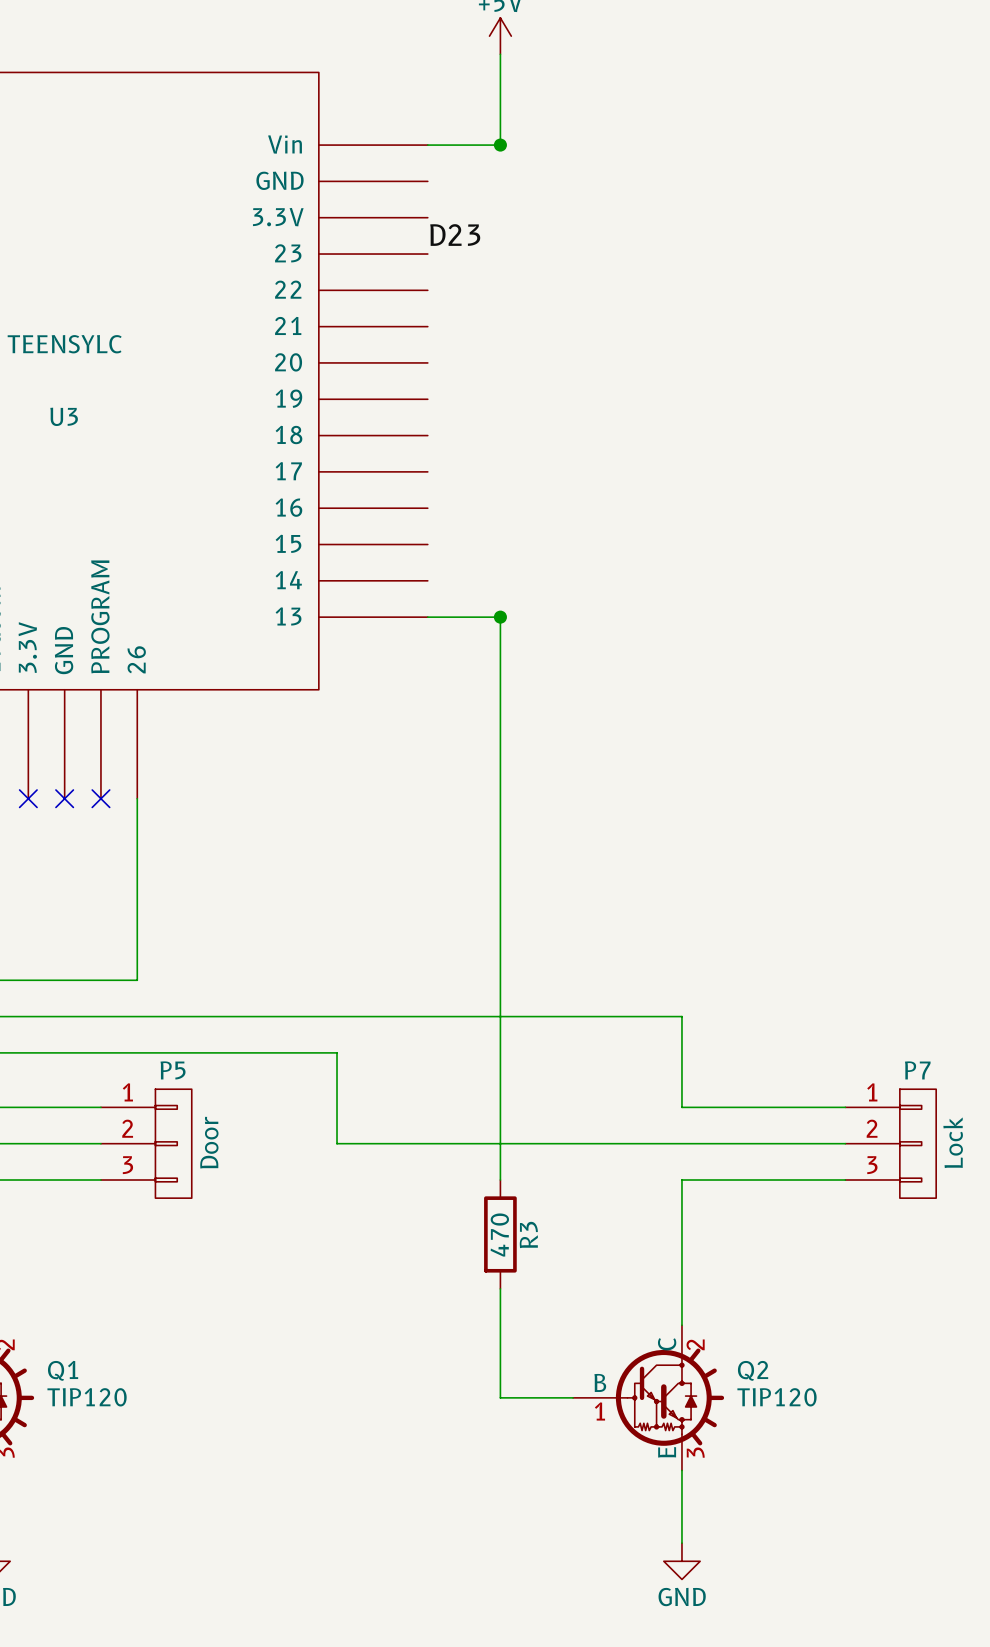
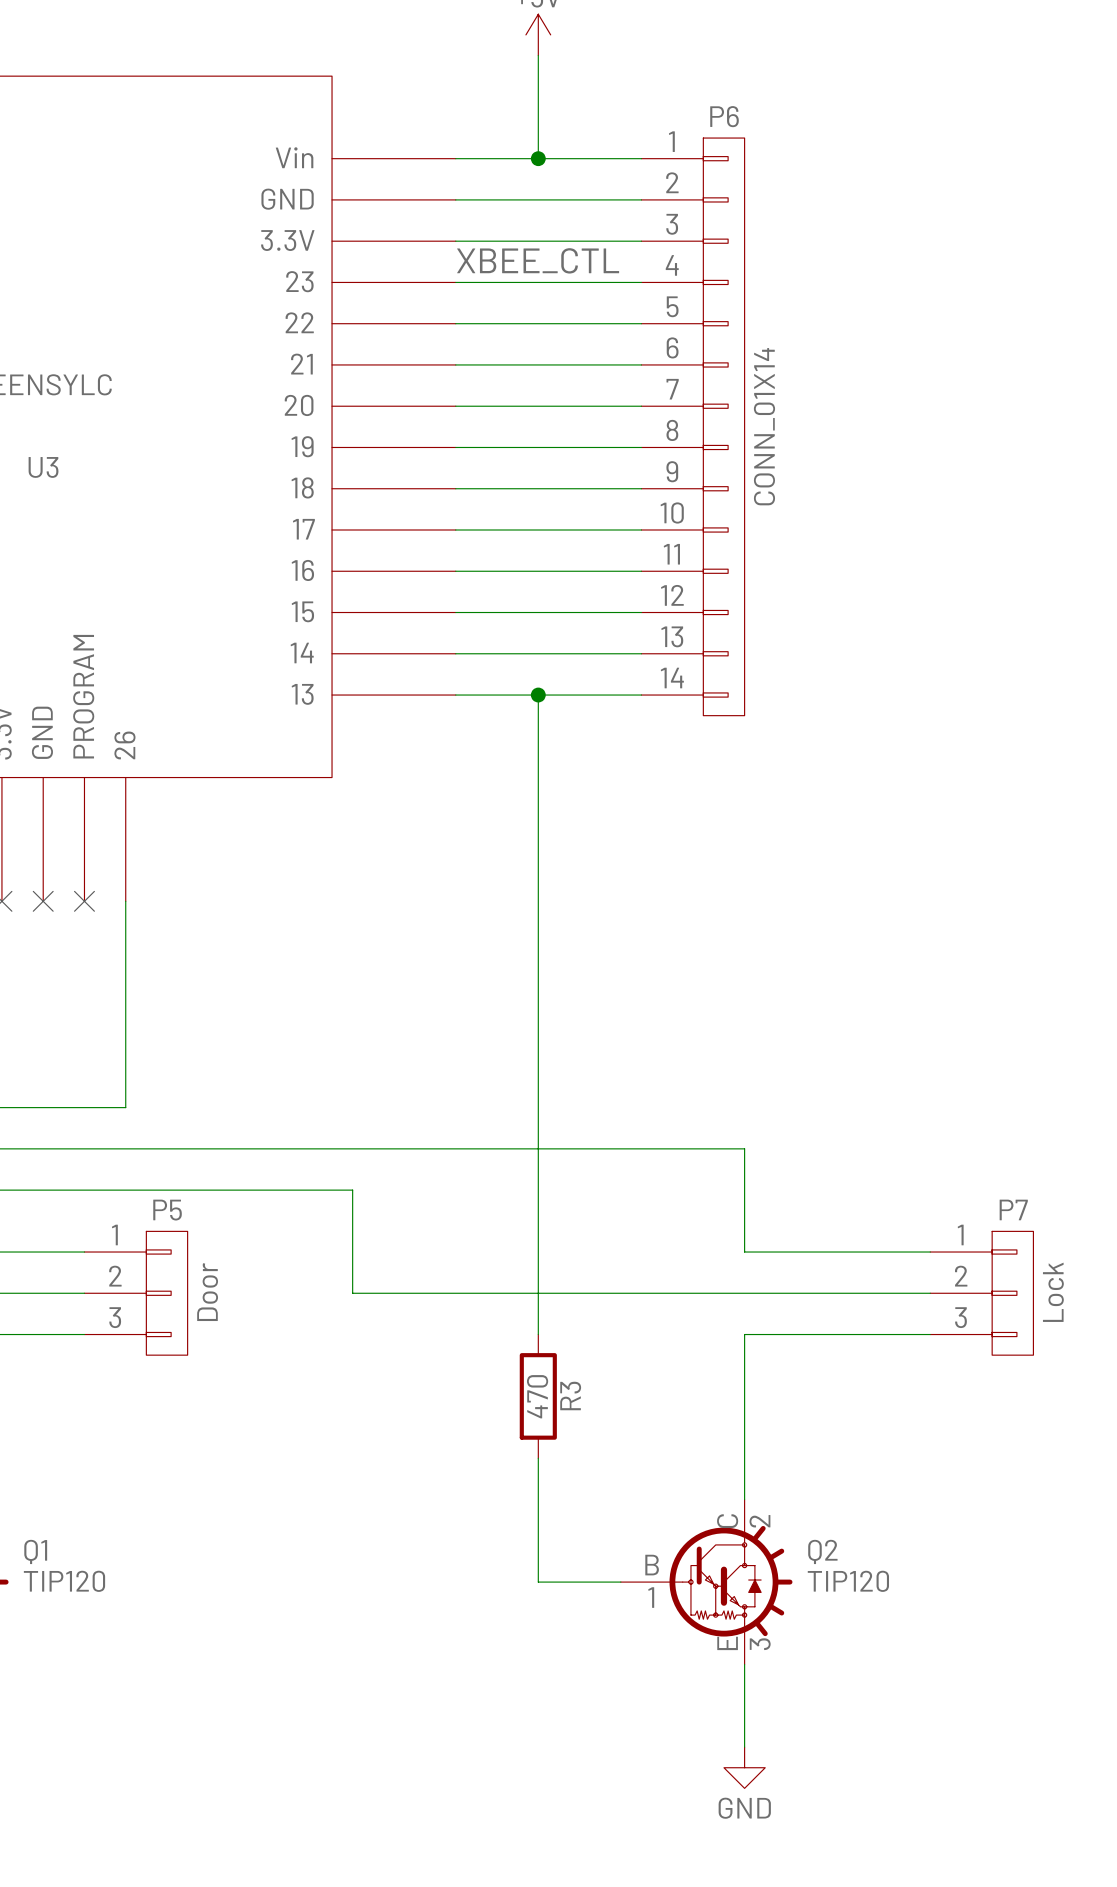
wire: none -> (538, 158) (641, 158)
wire: none -> (455, 199) (641, 199)
wire: none -> (455, 241) (641, 241)
label: D23 (455, 235) -> XBEE_CTL (538, 260)
wire: none -> (455, 282) (641, 282)
wire: none -> (455, 323) (641, 323)
wire: none -> (455, 364) (641, 364)
wire: none -> (455, 406) (641, 406)
P6: none -> CONN_01X14 (693, 426)
wire: none -> (455, 447) (641, 447)
wire: none -> (455, 488) (641, 488)
wire: none -> (455, 529) (641, 529)
wire: none -> (455, 571) (641, 571)
wire: none -> (455, 612) (641, 612)
wire: none -> (455, 653) (641, 653)
wire: none -> (538, 695) (641, 695)

